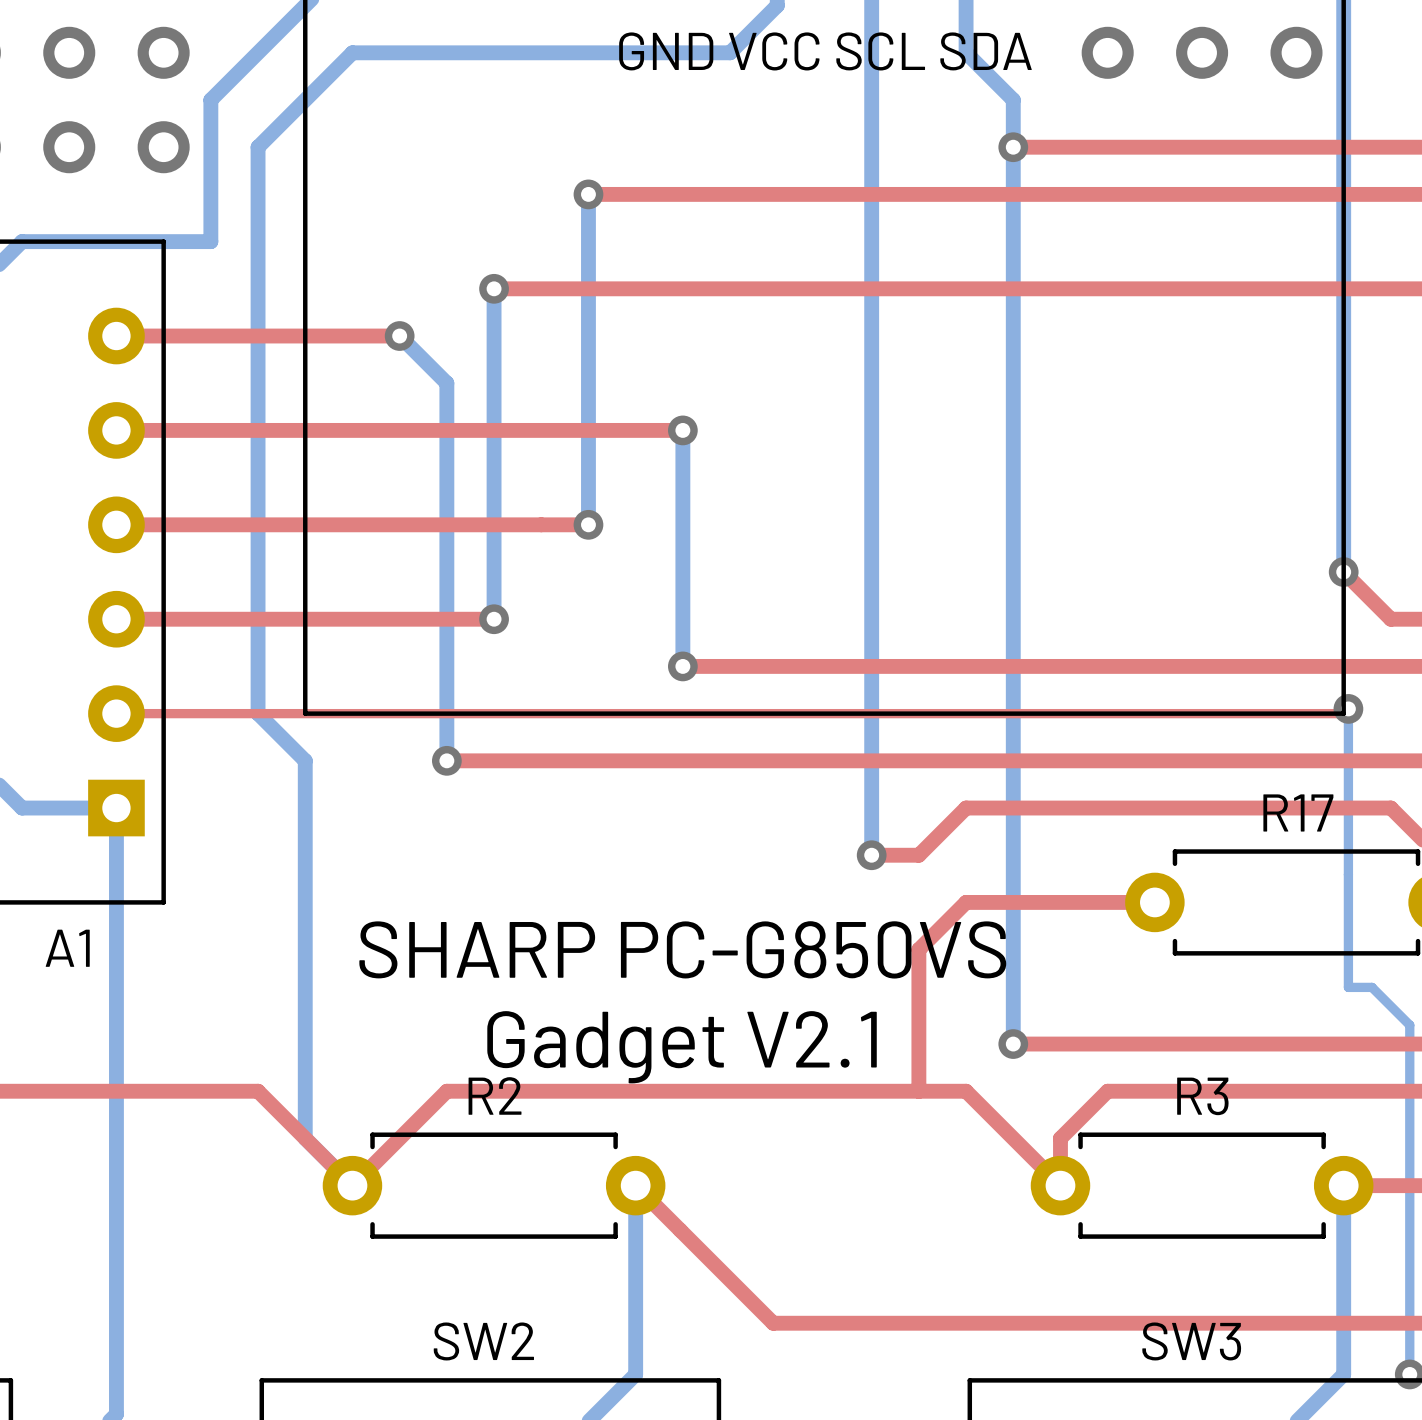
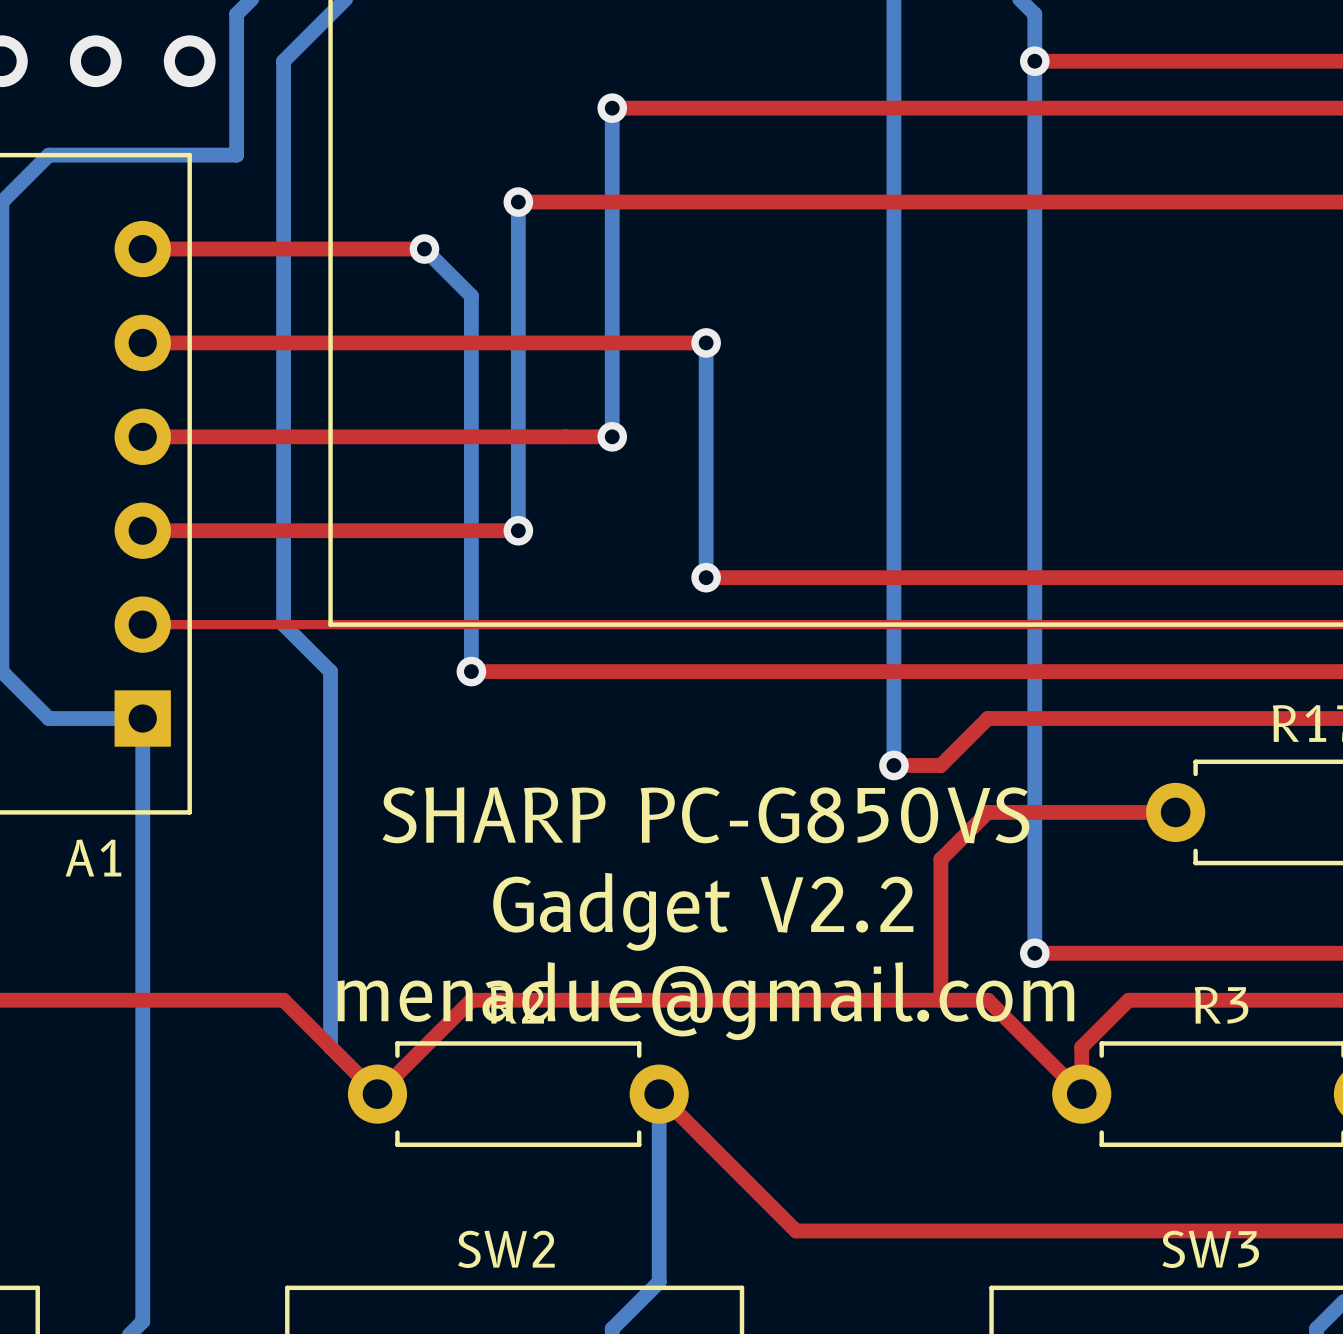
text position: SHARP PC-G850VS (682, 949) -> SHARP PC-G850VS (705, 815)
text: Gadget V2.1 (682, 1047) -> Gadget V2.2 (703, 911)
text: none -> menadue@gmail.com (705, 1001)

